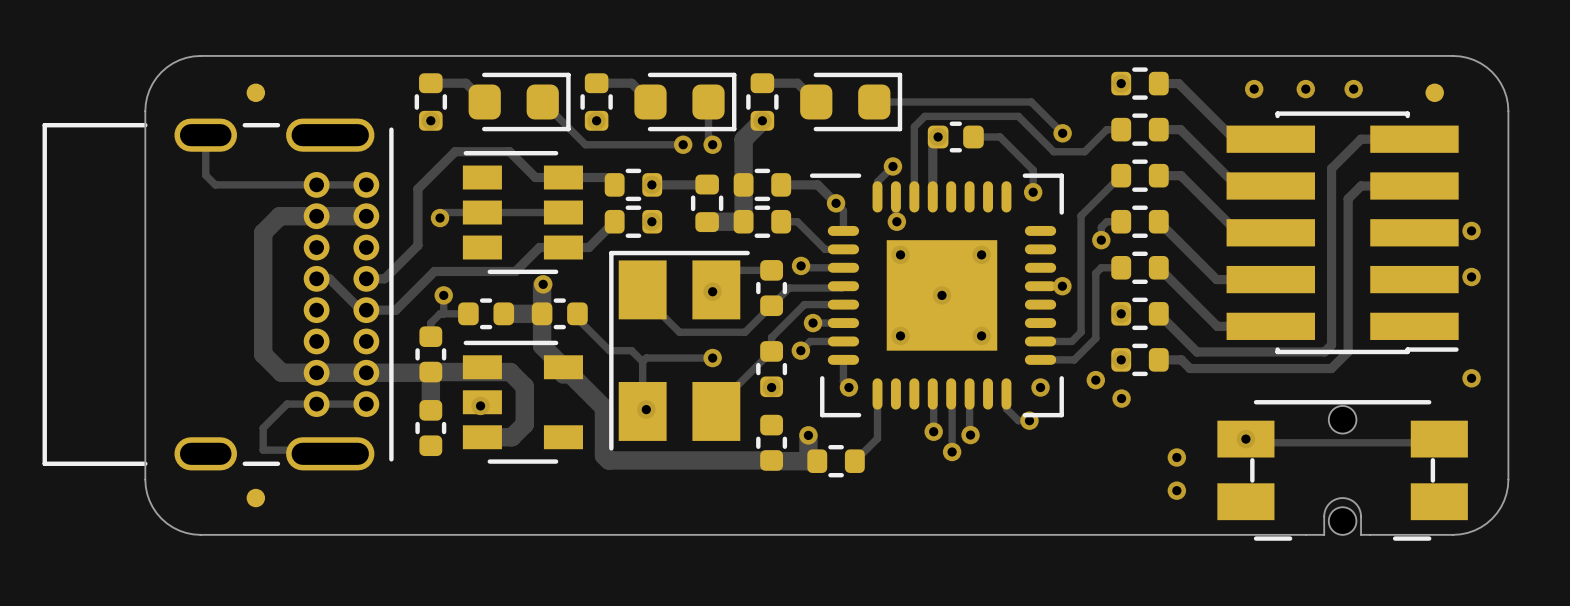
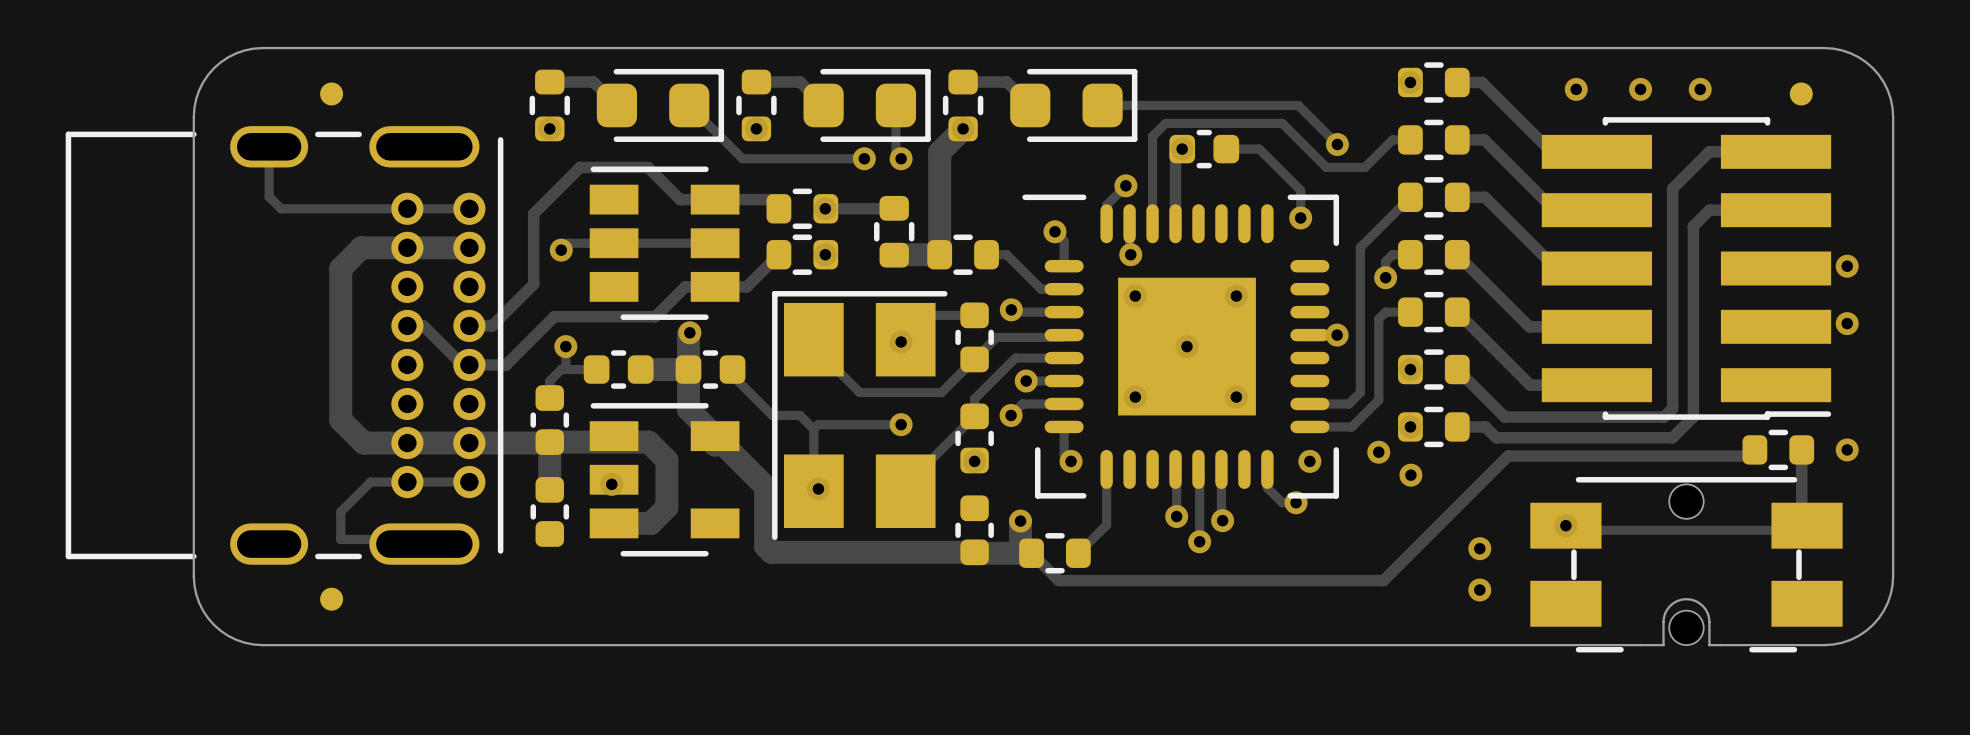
part position: (762, 184) -> (1778, 449)
track: (781, 184) (817, 184) (836, 203) -> none
track: none -> (1754, 449) (1748, 456) (1508, 456) (1383, 580) (1058, 580) (1031, 553)
track: none -> (1801, 449) (1801, 520)

